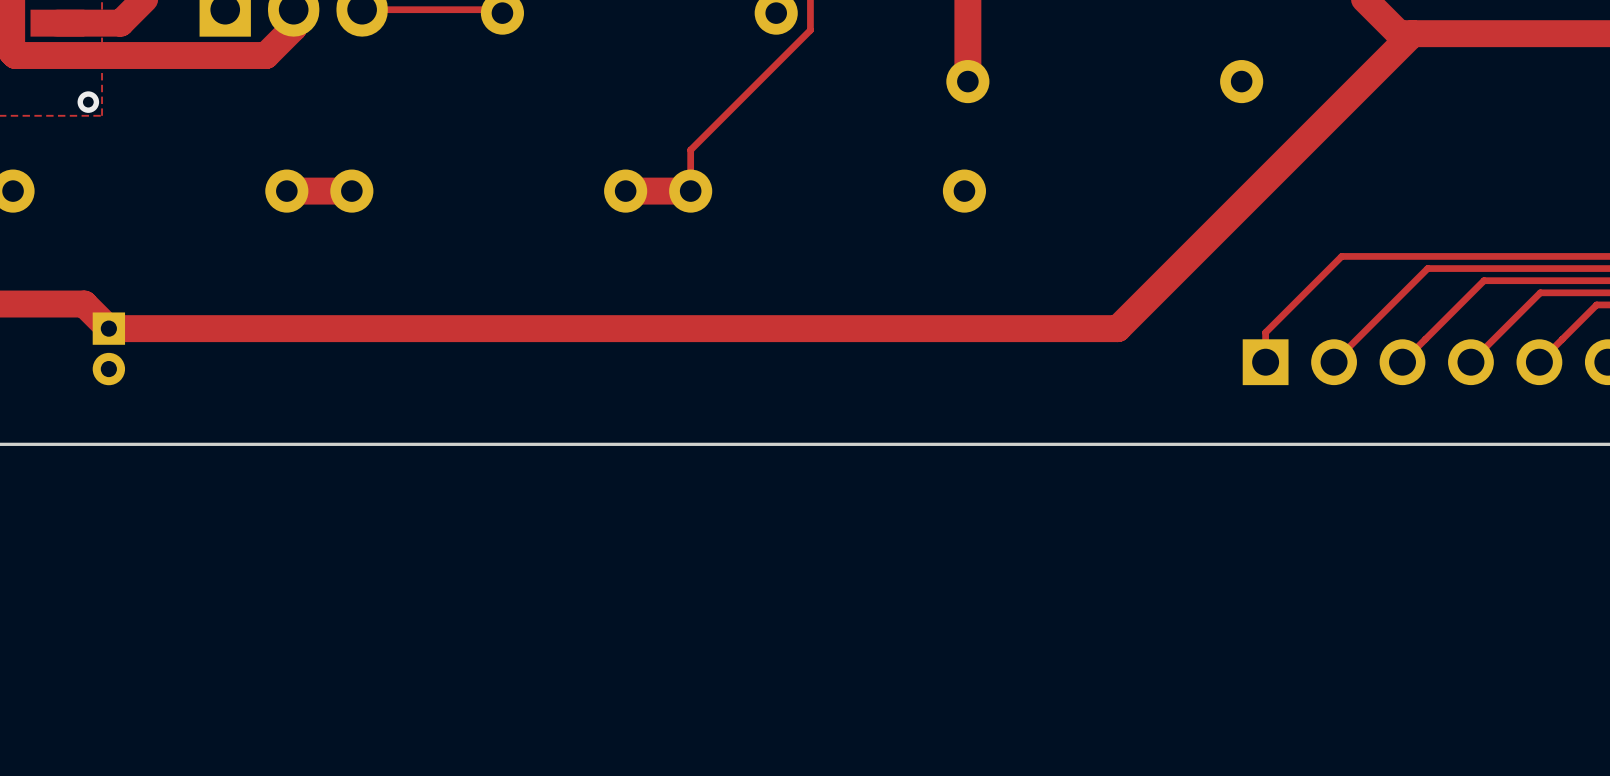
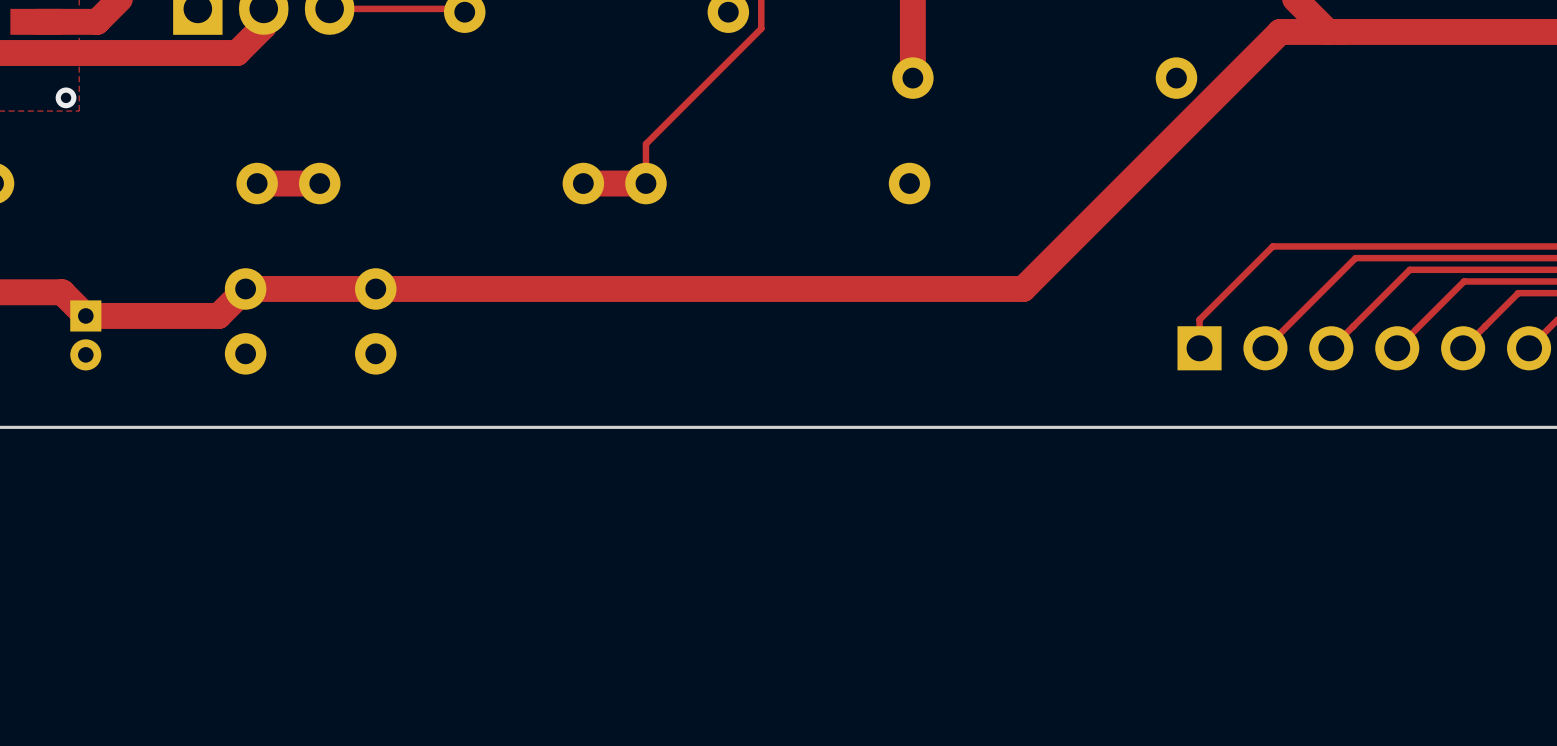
top track: (1412, 33) (1117, 328) (246, 328) -> (1328, 31) (1280, 31) (1023, 288) (245, 288) (218, 315)
part: none -> (245, 321)
part: none -> (375, 321)

